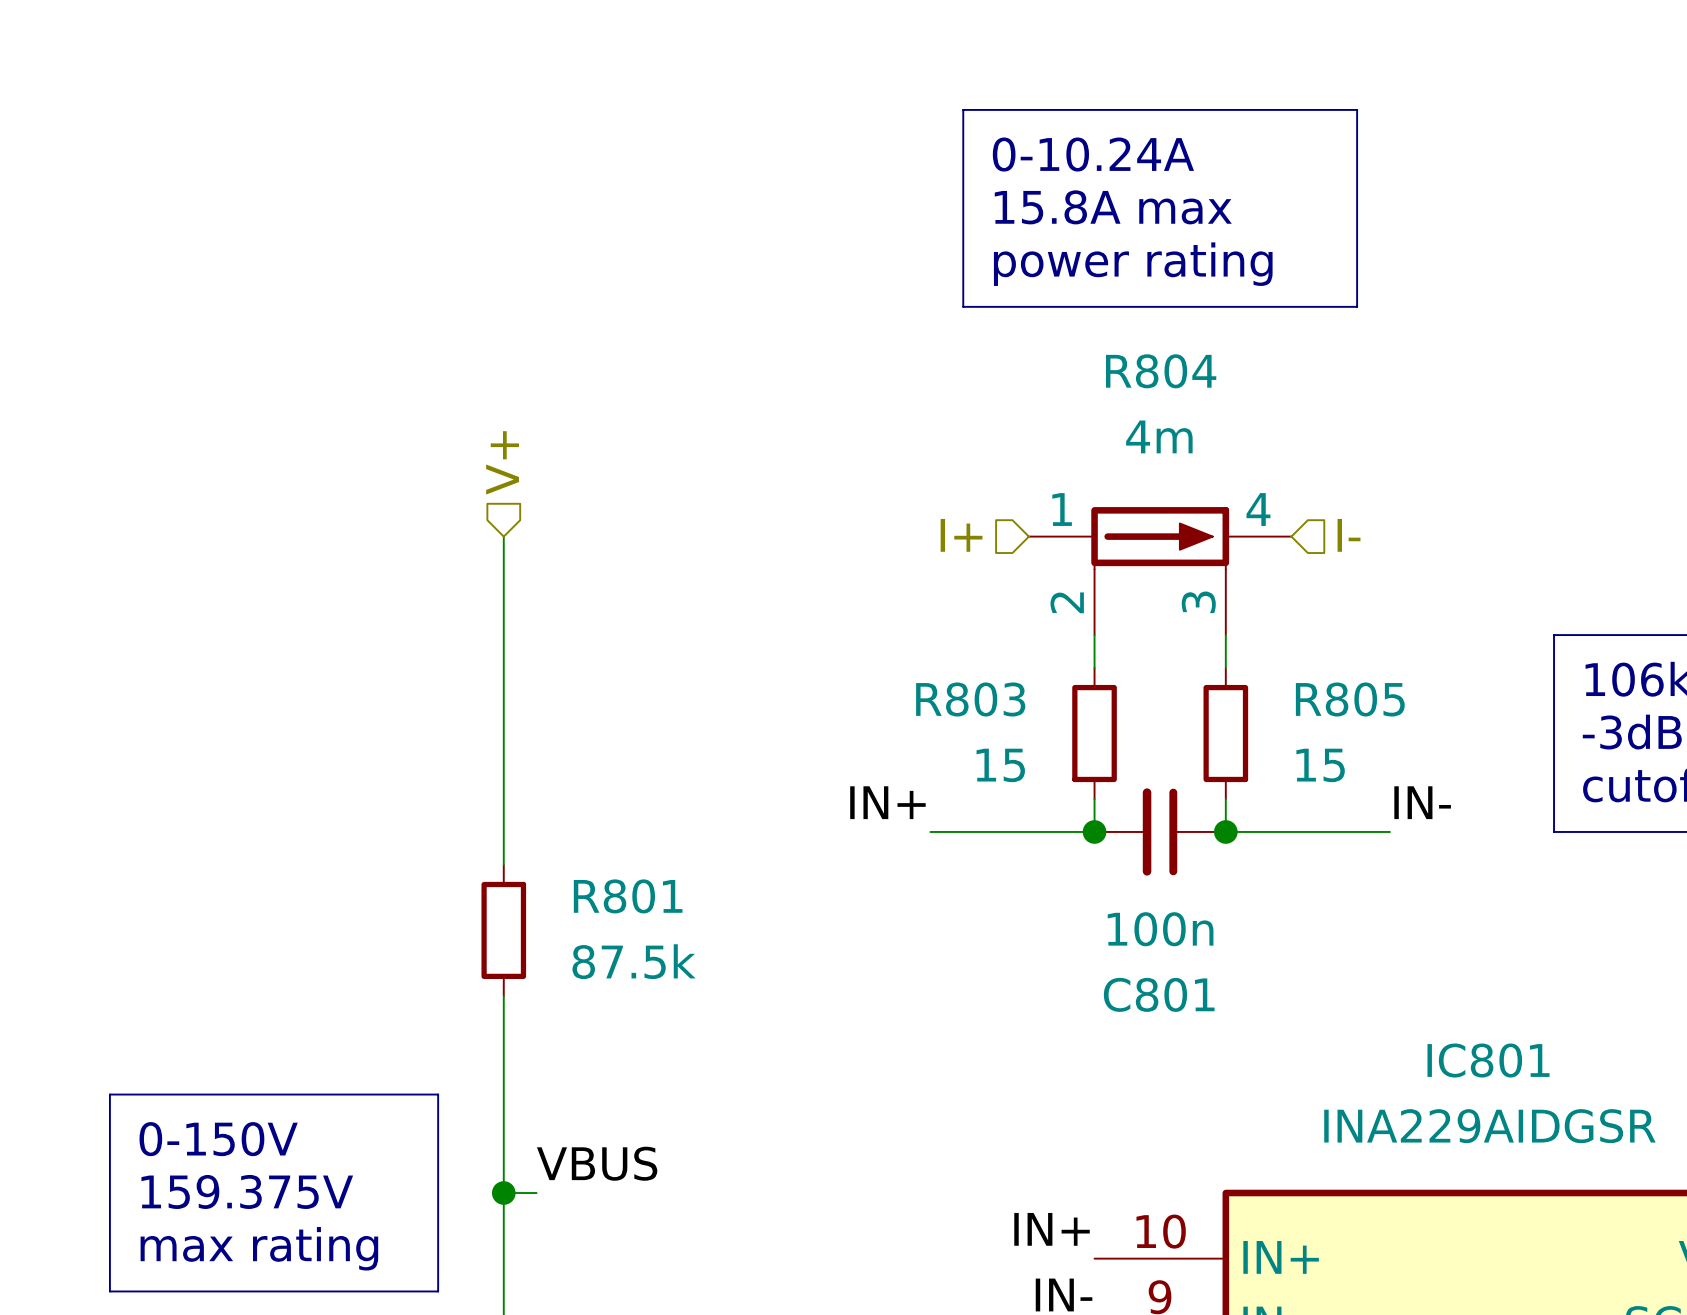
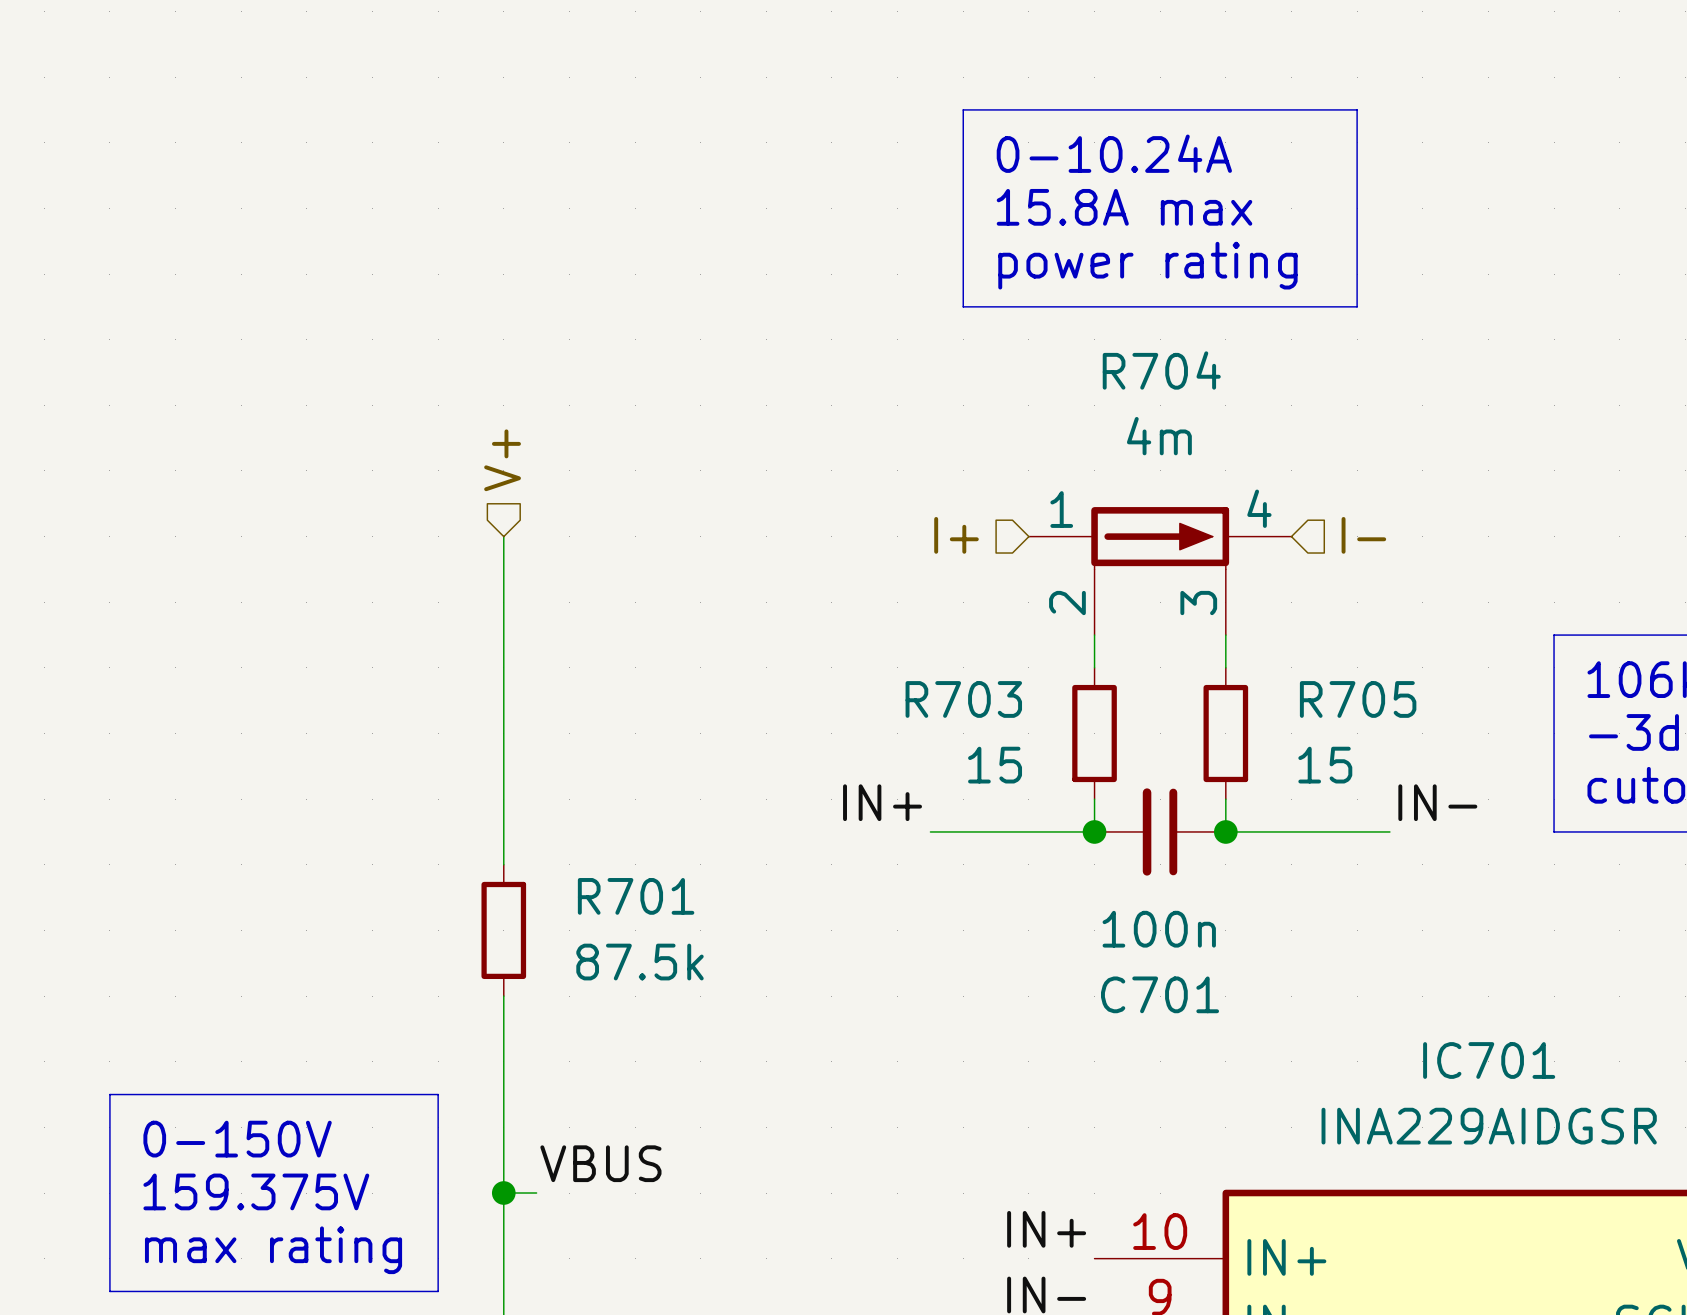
R804 name: R804 (1161, 371) -> R704 (1161, 370)
R803 name: R803 (970, 699) -> R703 (963, 699)
R805 name: R805 (1350, 699) -> R705 (1358, 699)
R801 name: R801 (628, 896) -> R701 (636, 896)
C801 name: C801 (1159, 994) -> C701 (1160, 994)
IC801 name: IC801 (1488, 1060) -> IC701 (1489, 1060)

